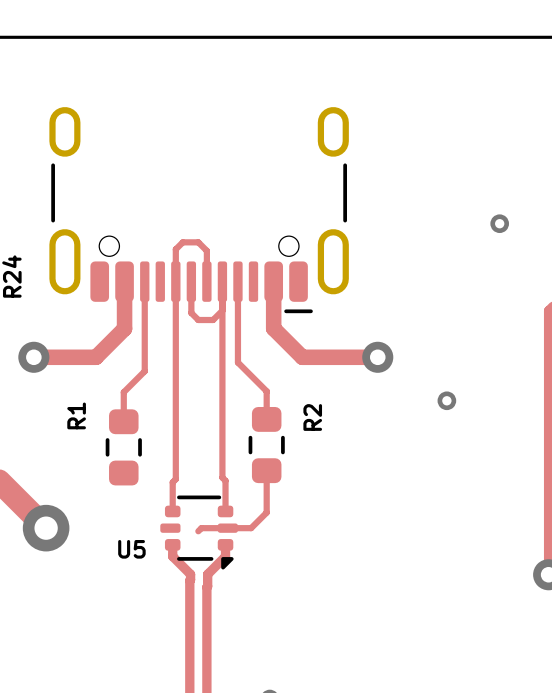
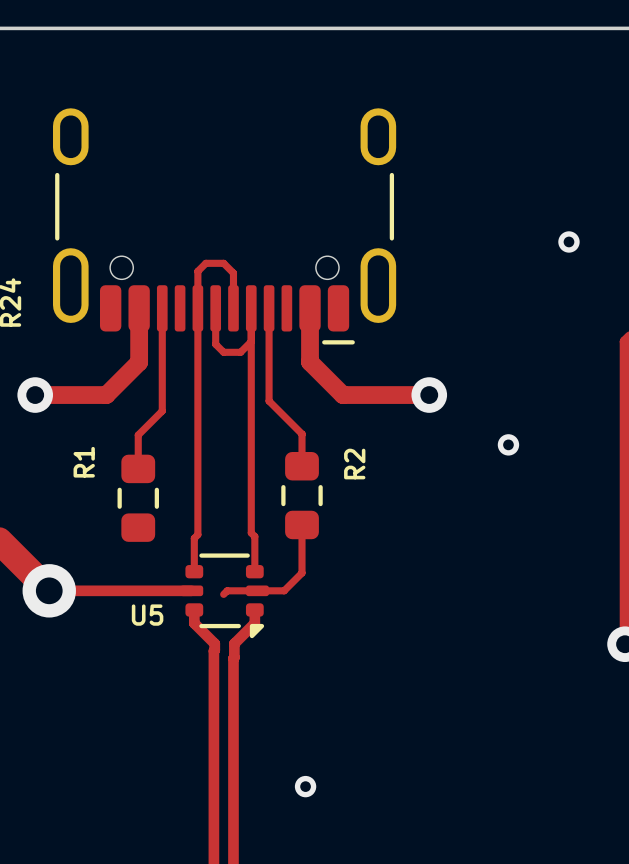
track: none -> (49, 590) (191, 590)

